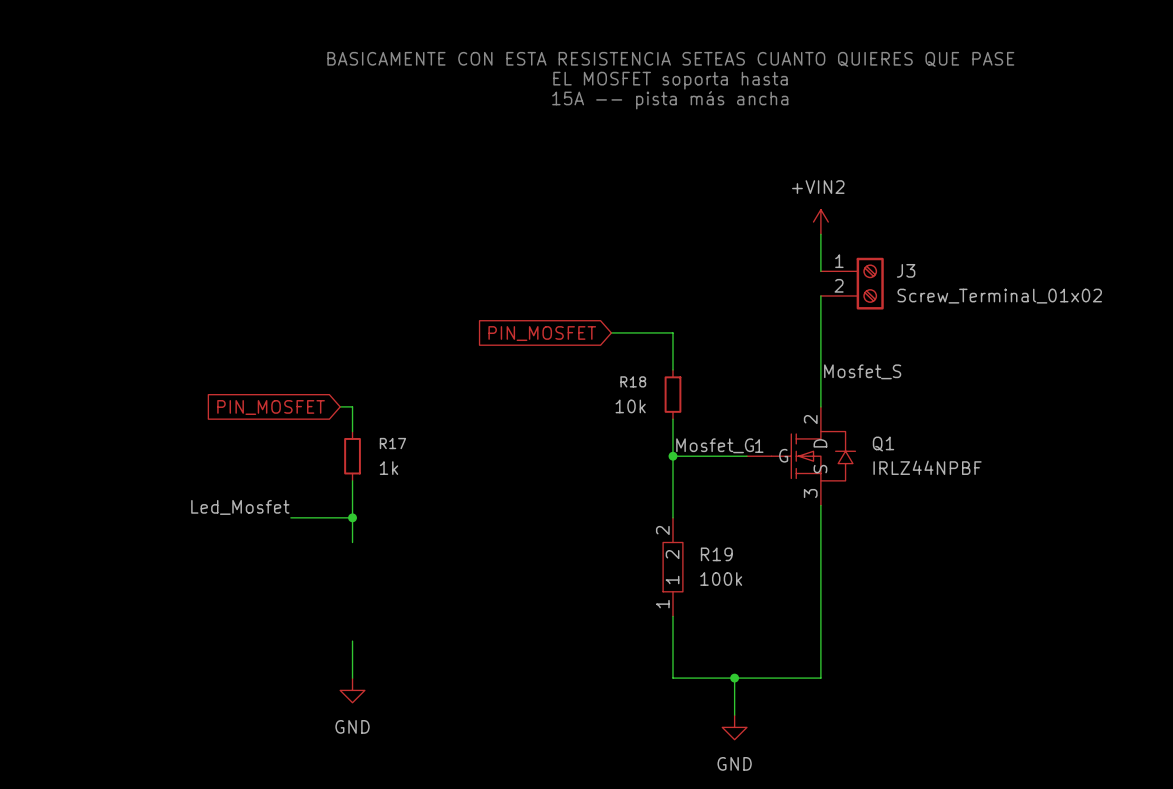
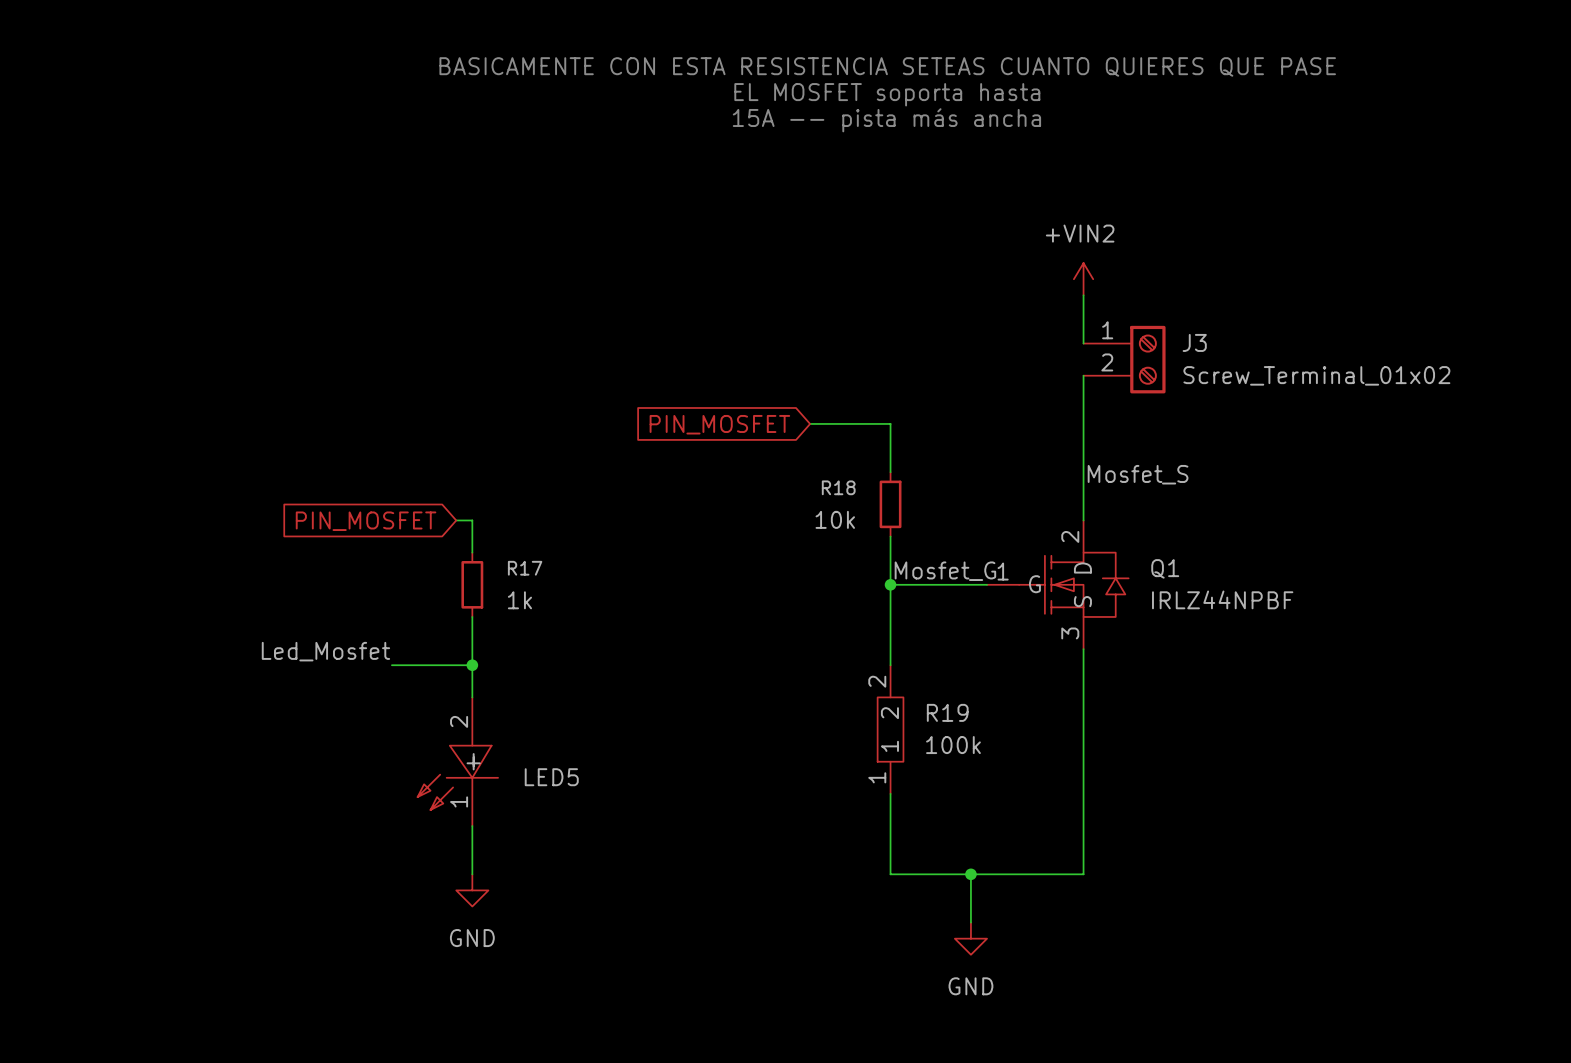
LED5: none -> (457, 761)

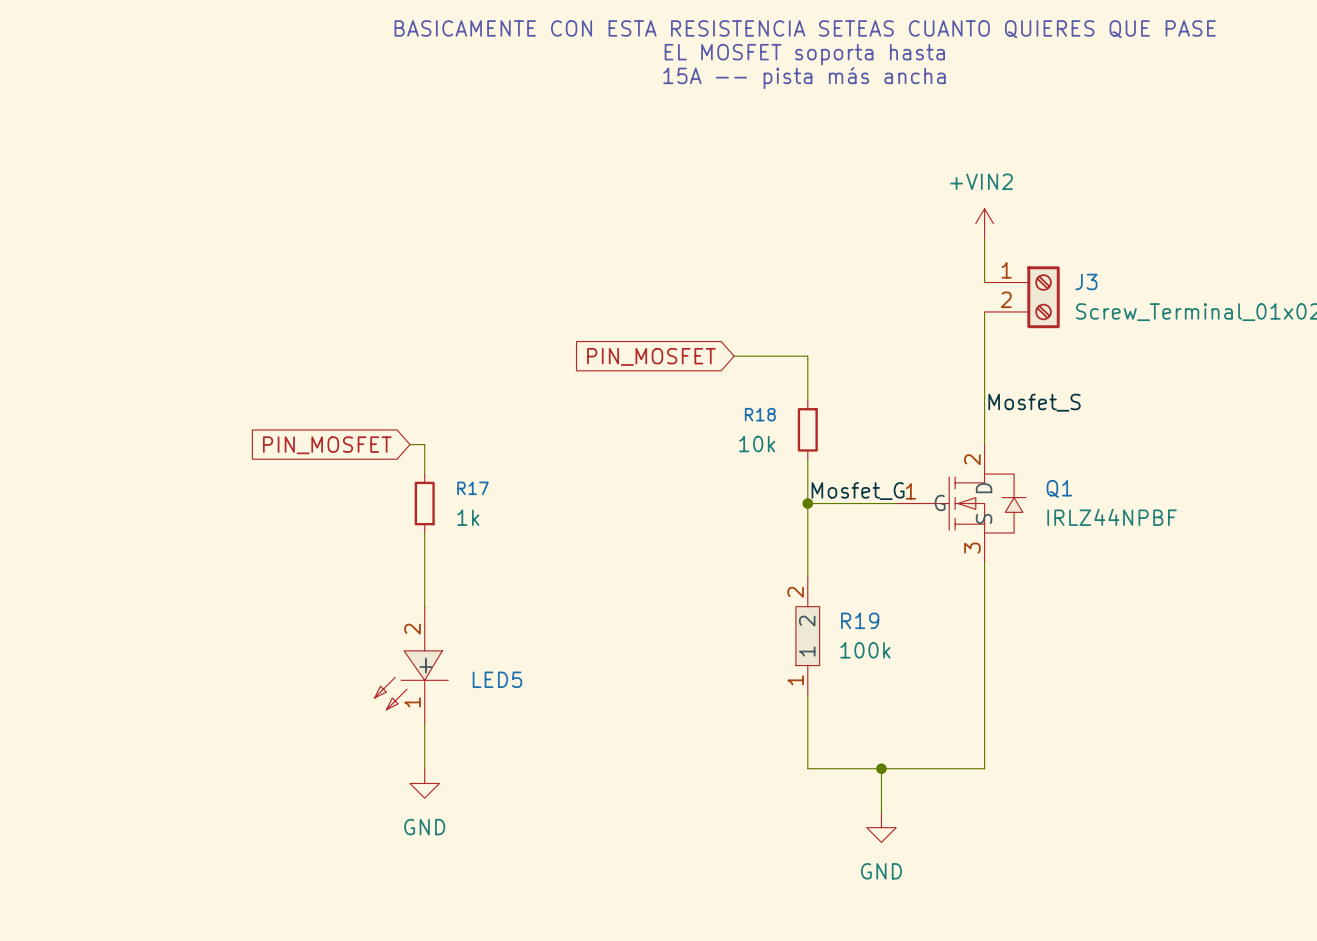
label: Led_Mosfet (325, 651) -> none
wire: (391, 665) (472, 665) -> none
junction: (472, 665) -> none

